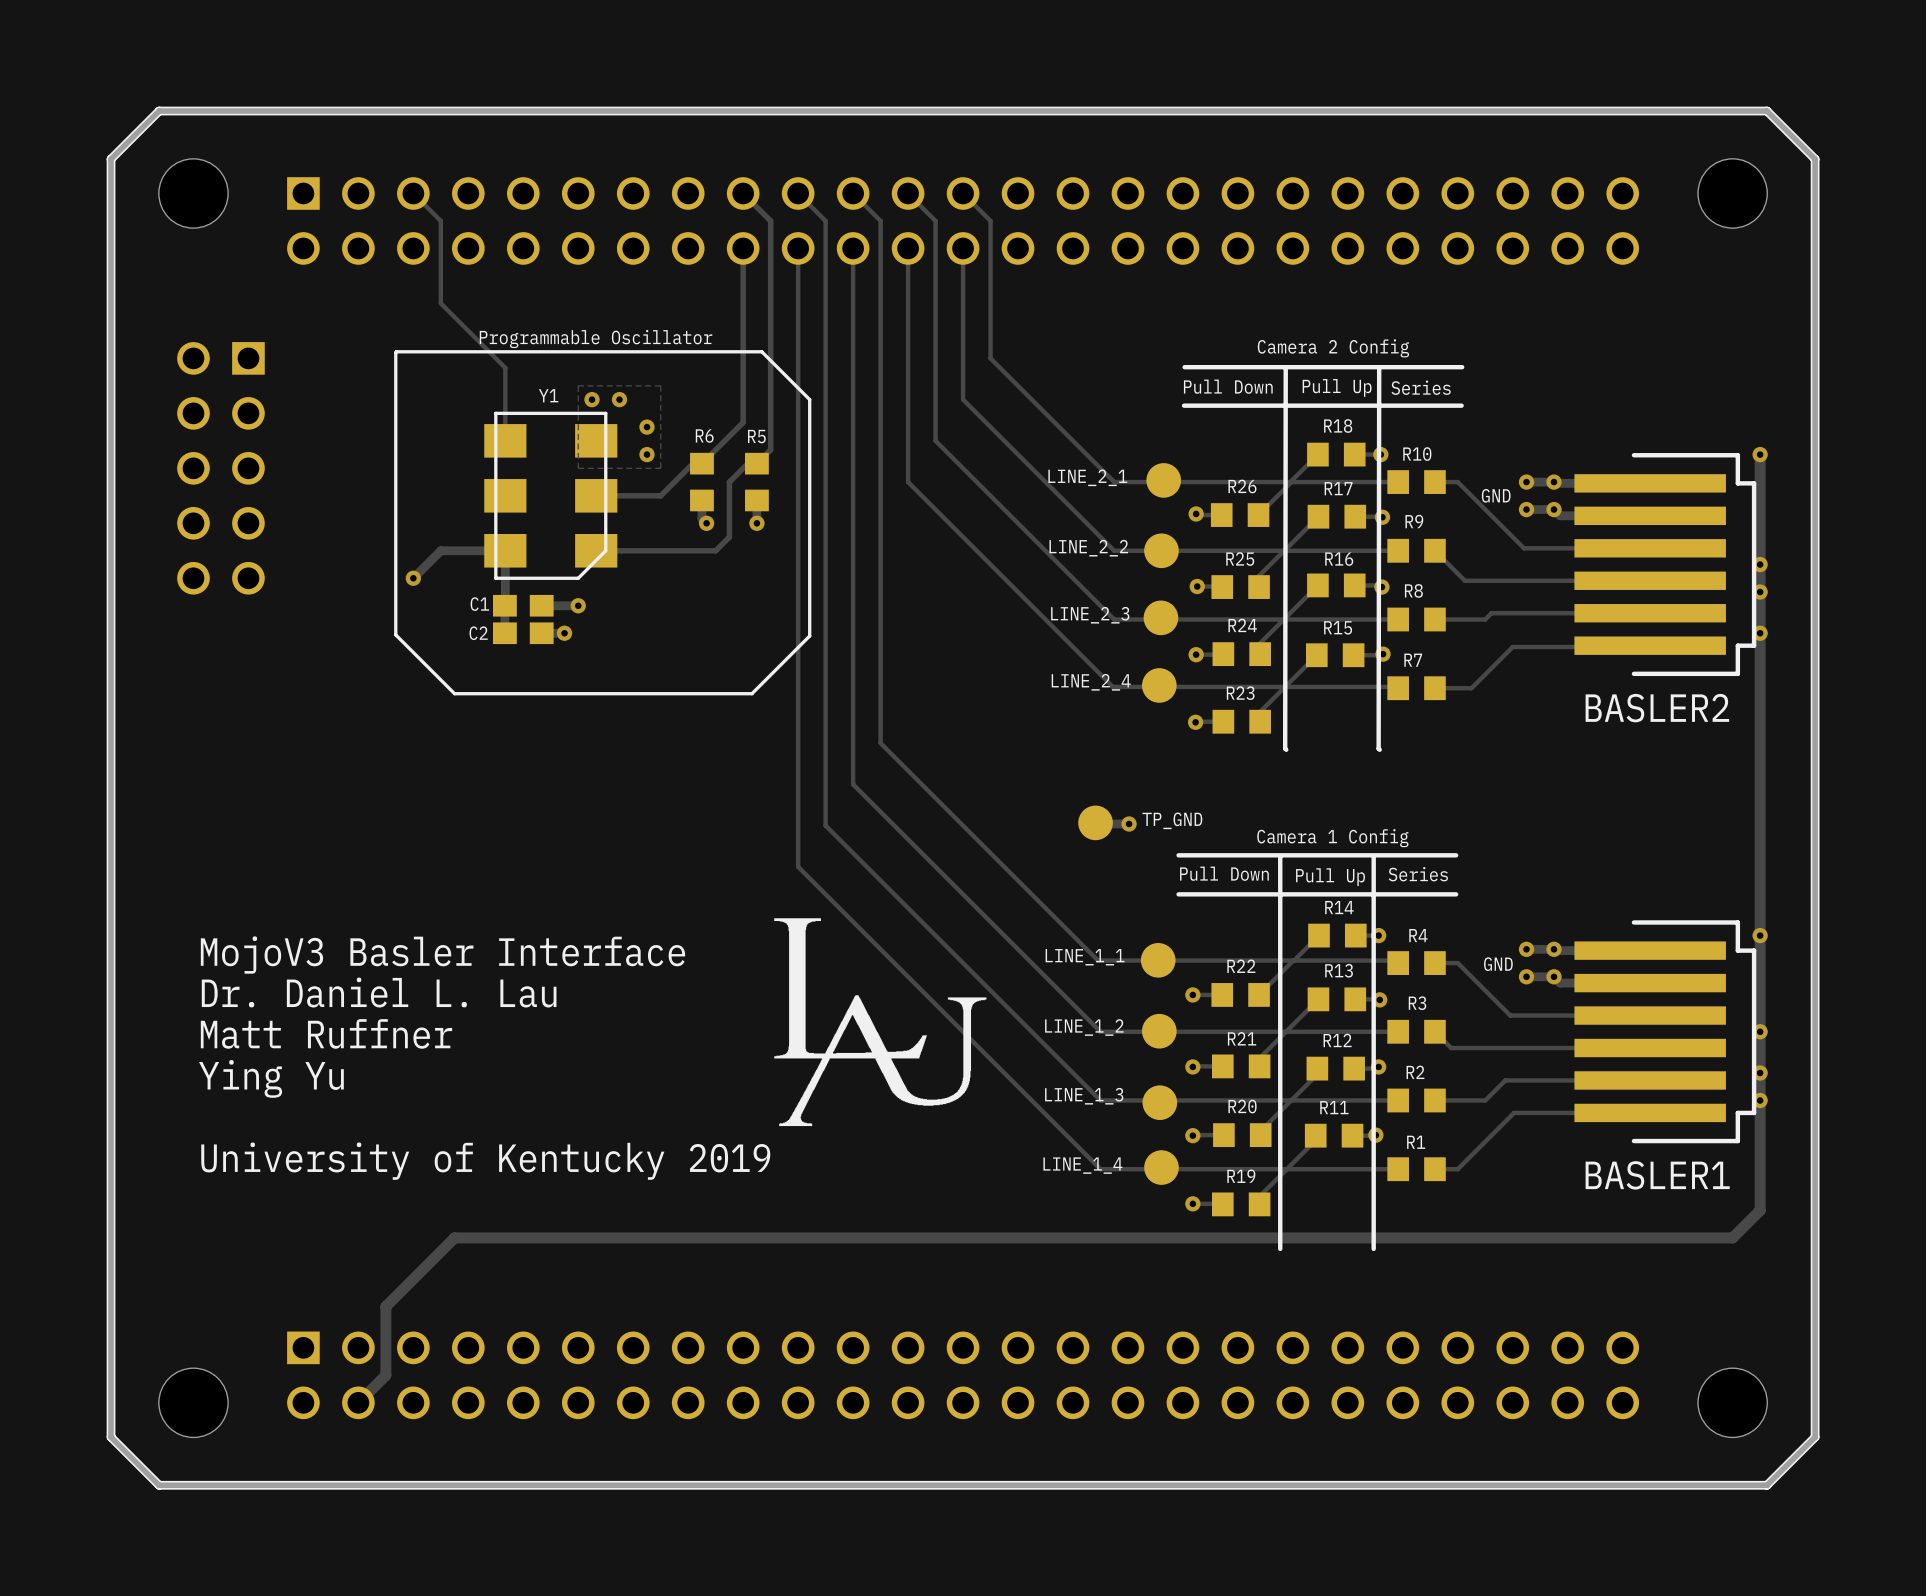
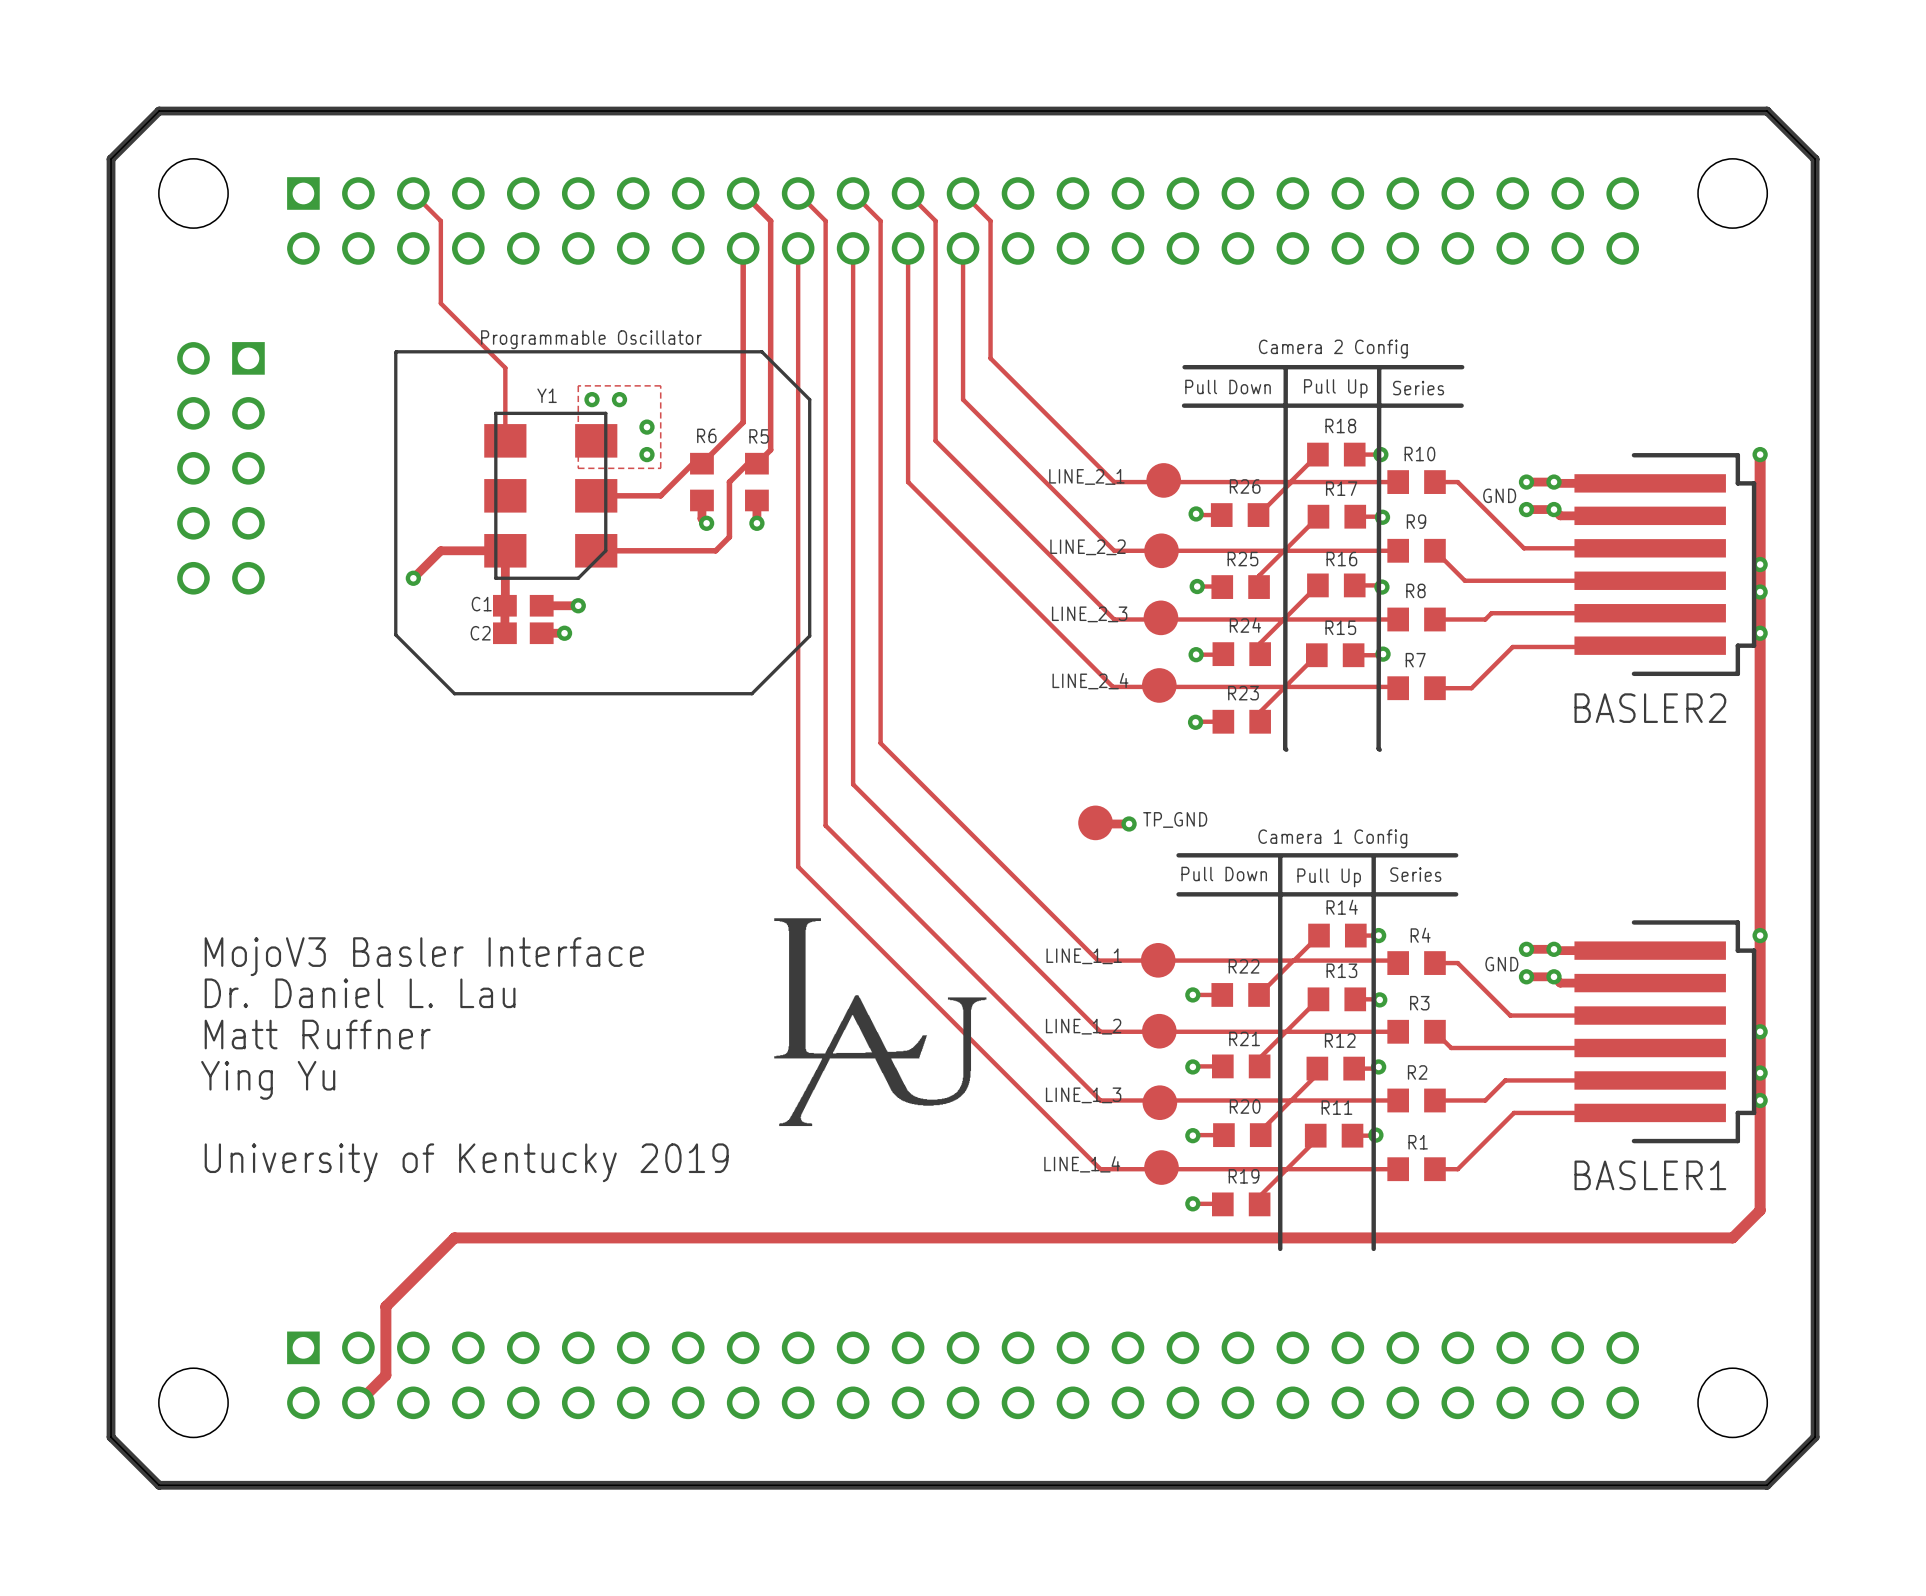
board edge: (159, 111) (1767, 111) (1815, 159) (1815, 1437) (1767, 1485) (159, 1485) (111, 1437) (111, 159) (159, 111) -> none

